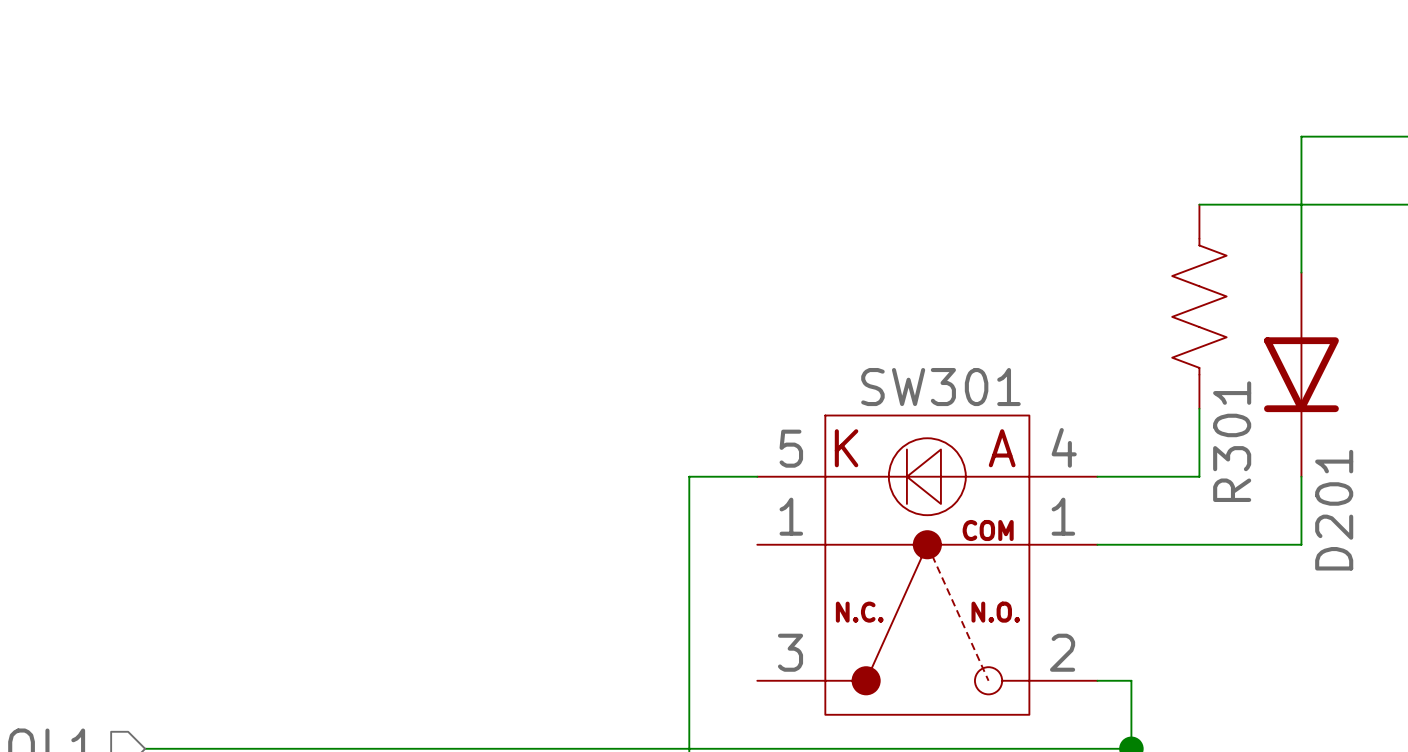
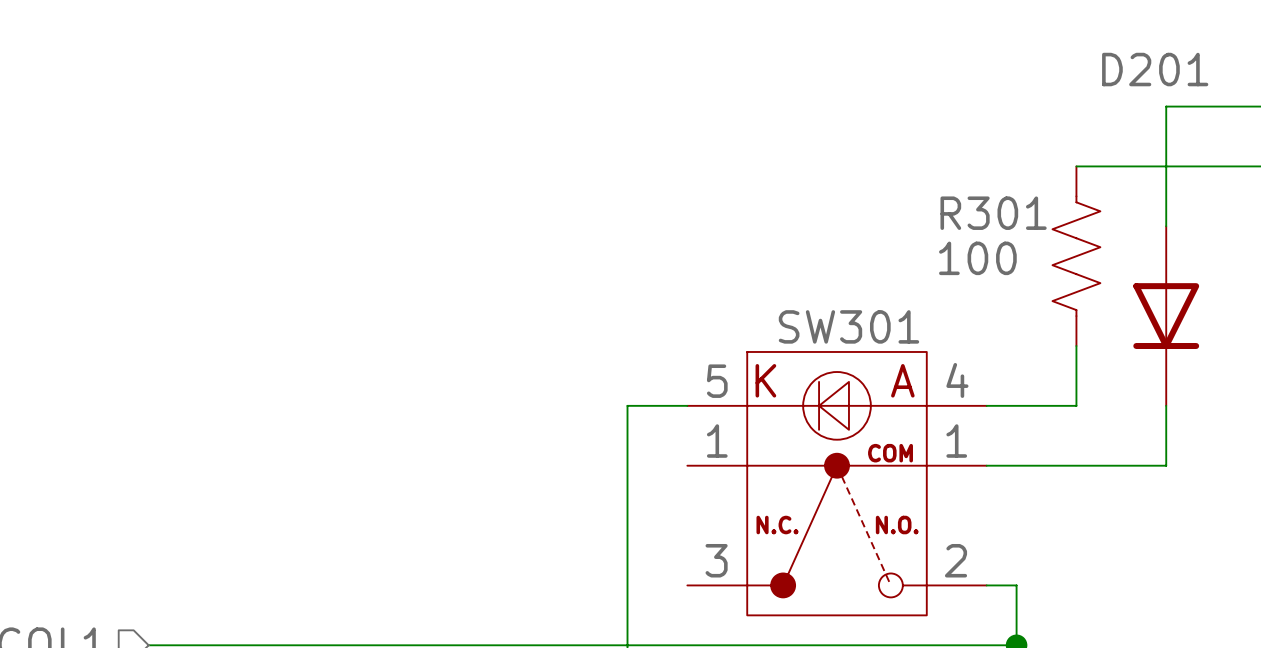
R301 value: none -> 100 (977, 258)
R301 name rotation: 0° (1232, 441) -> 90° clockwise (993, 213)
R301 name position: R301 (1232, 441) -> R301 (993, 213)
D201 name rotation: 0° (1334, 510) -> 90° clockwise (1155, 69)
D201 name position: D201 (1334, 510) -> D201 (1155, 69)

